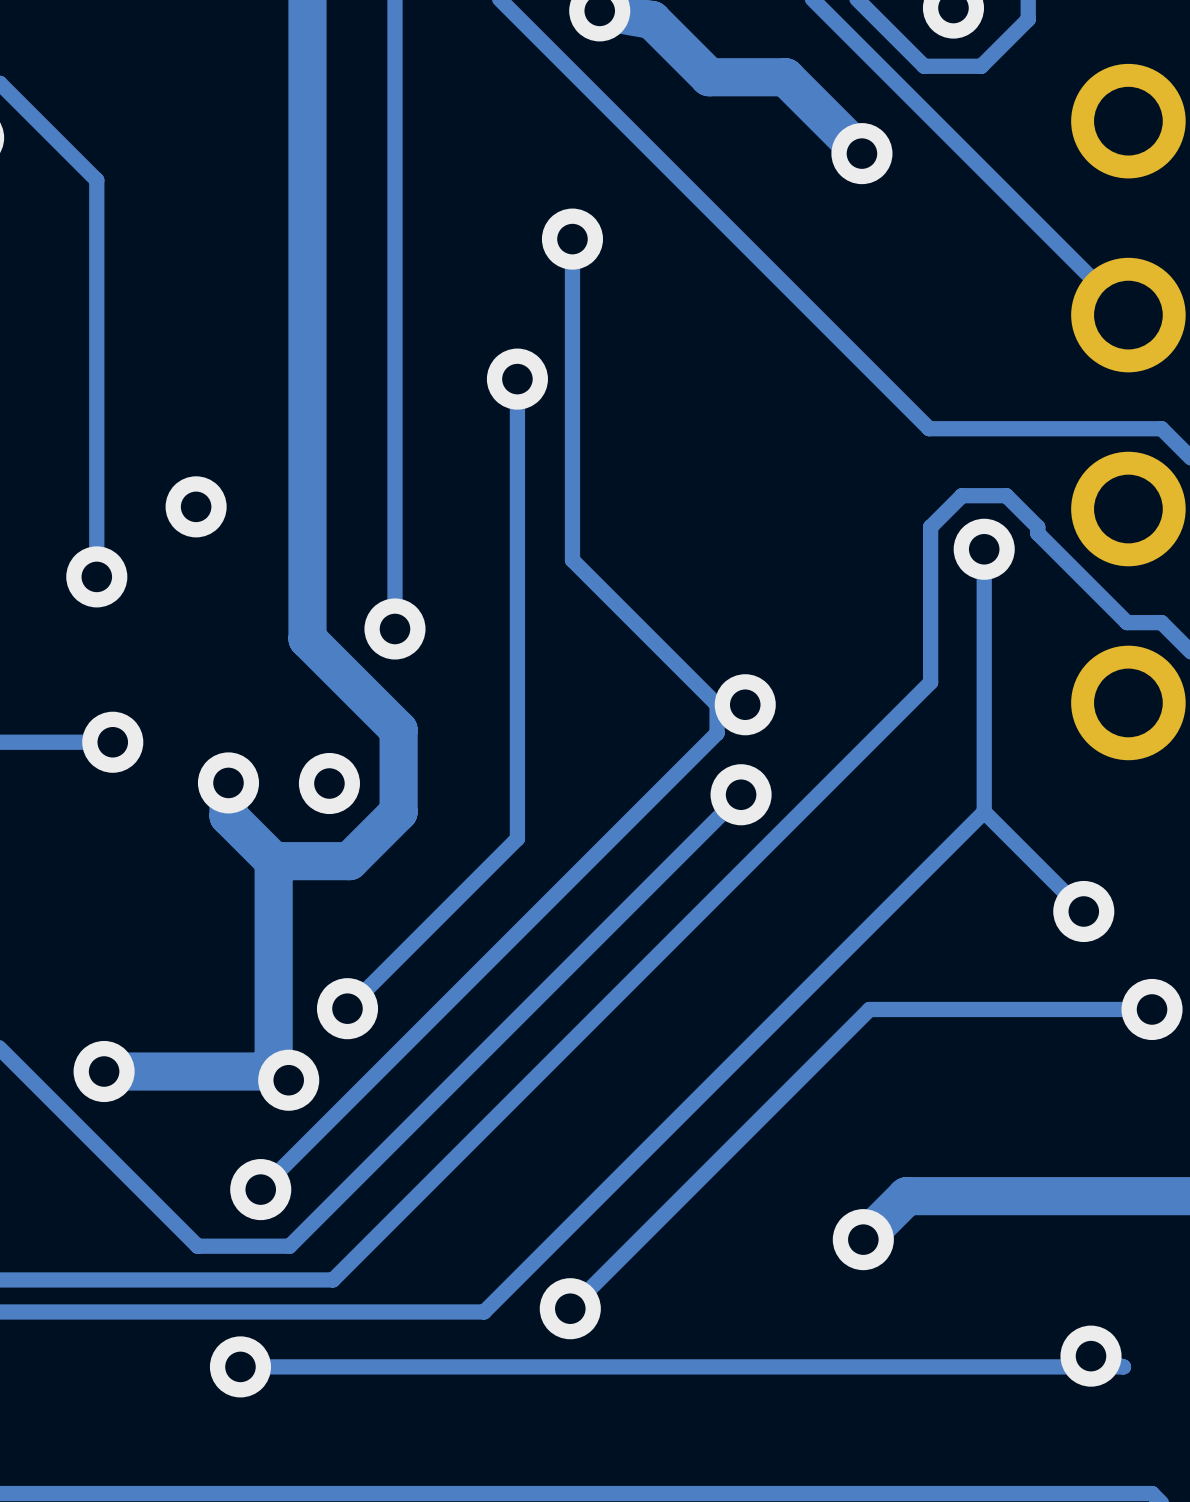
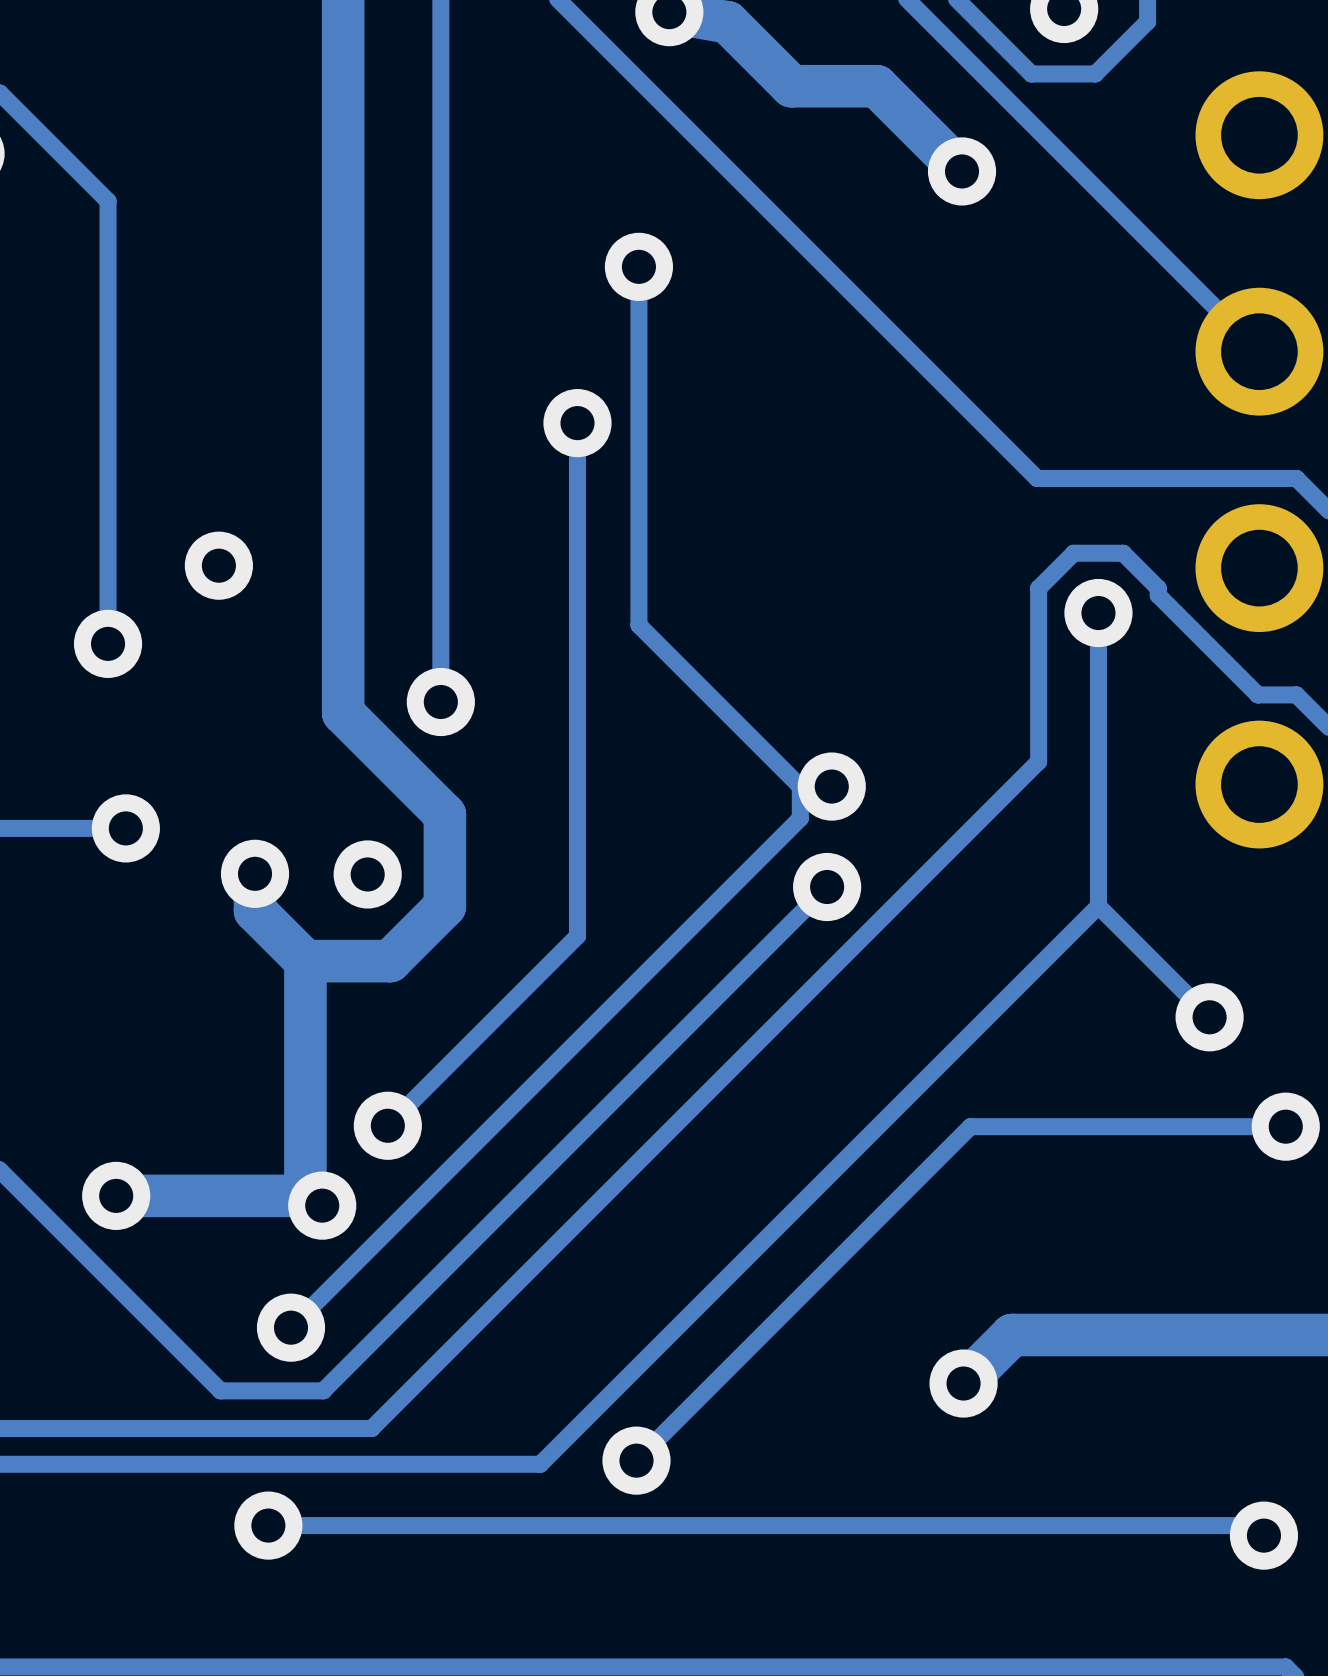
via position: (1091, 1356) -> (1263, 1535)

